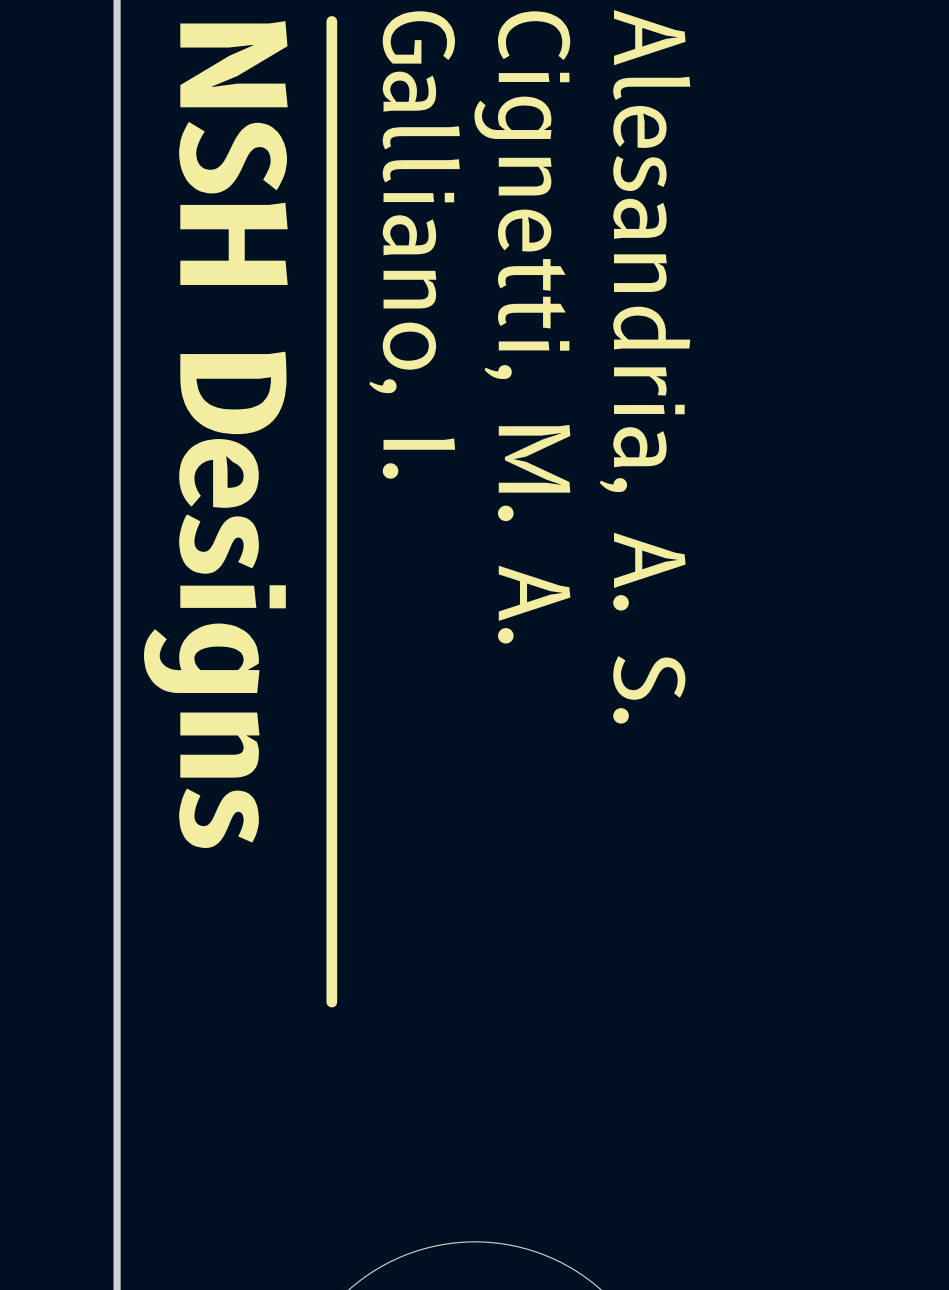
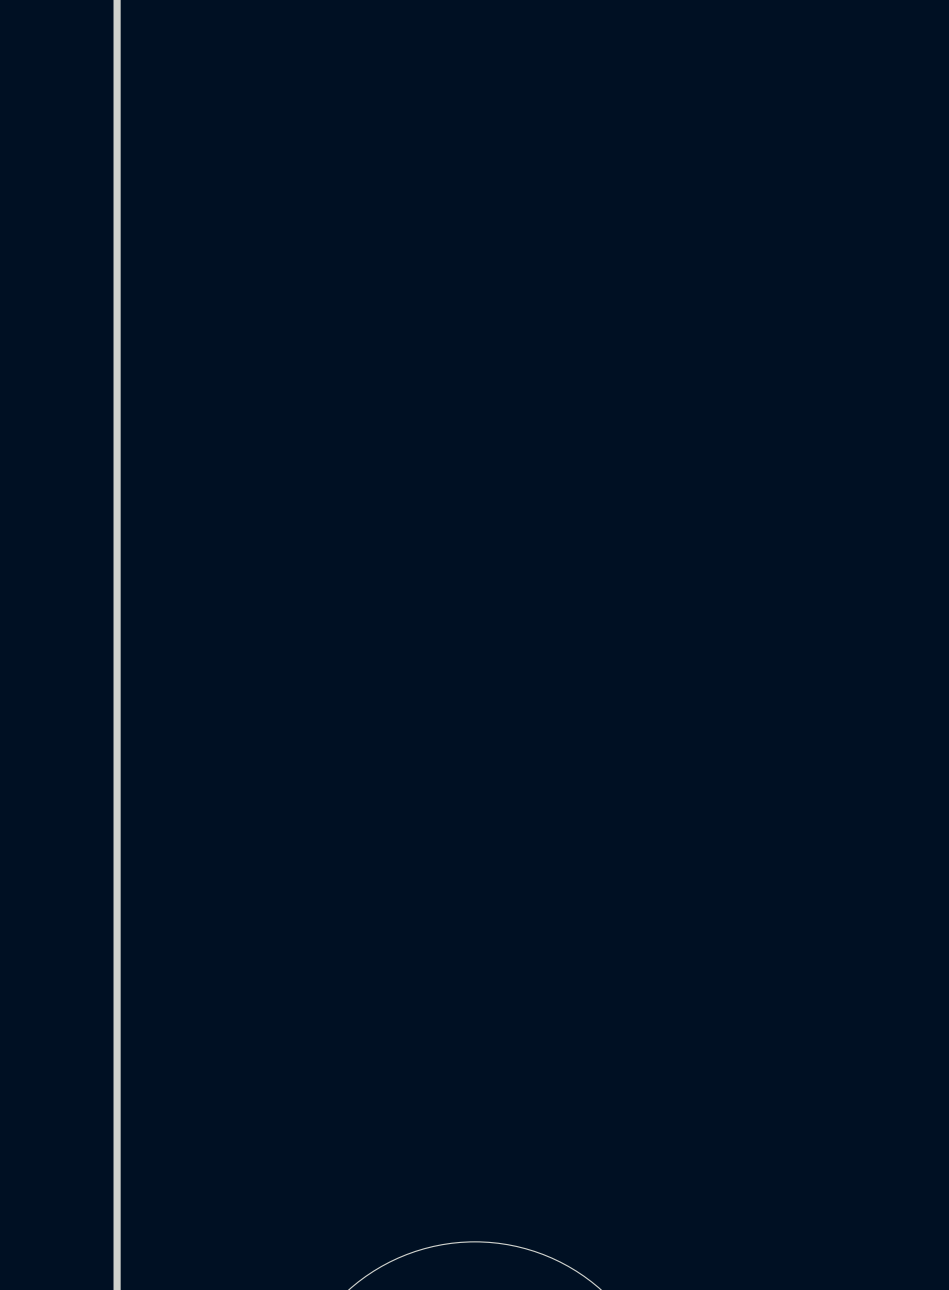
line: (331, 21) (331, 1002) -> none
text: Galliano, I. (414, 245) -> none
text: Cignetti, M. A. (522, 327) -> none
text: Alesandria, A. S. (645, 366) -> none
text: NSH Designs (215, 434) -> none

